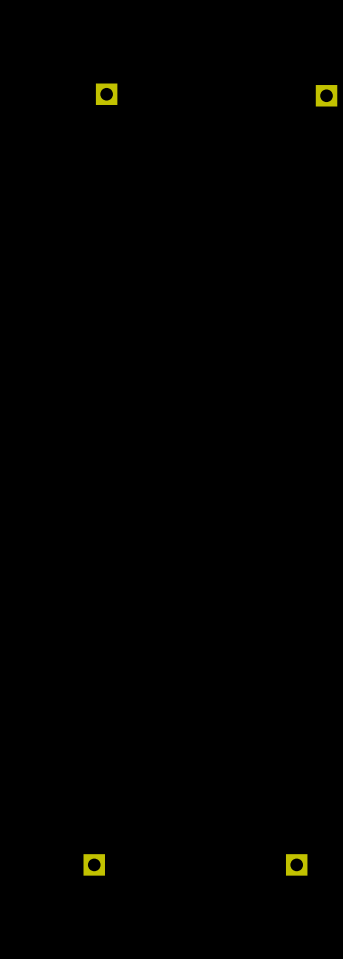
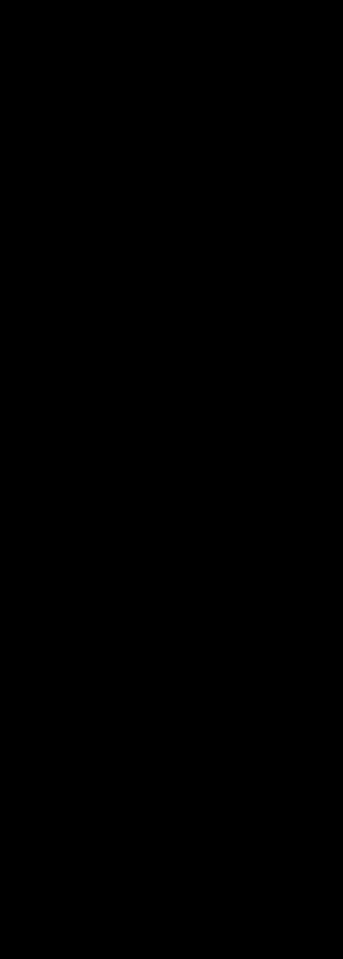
part: (106, 94) -> none
part: (326, 95) -> none
part: (94, 864) -> none
part: (296, 864) -> none

